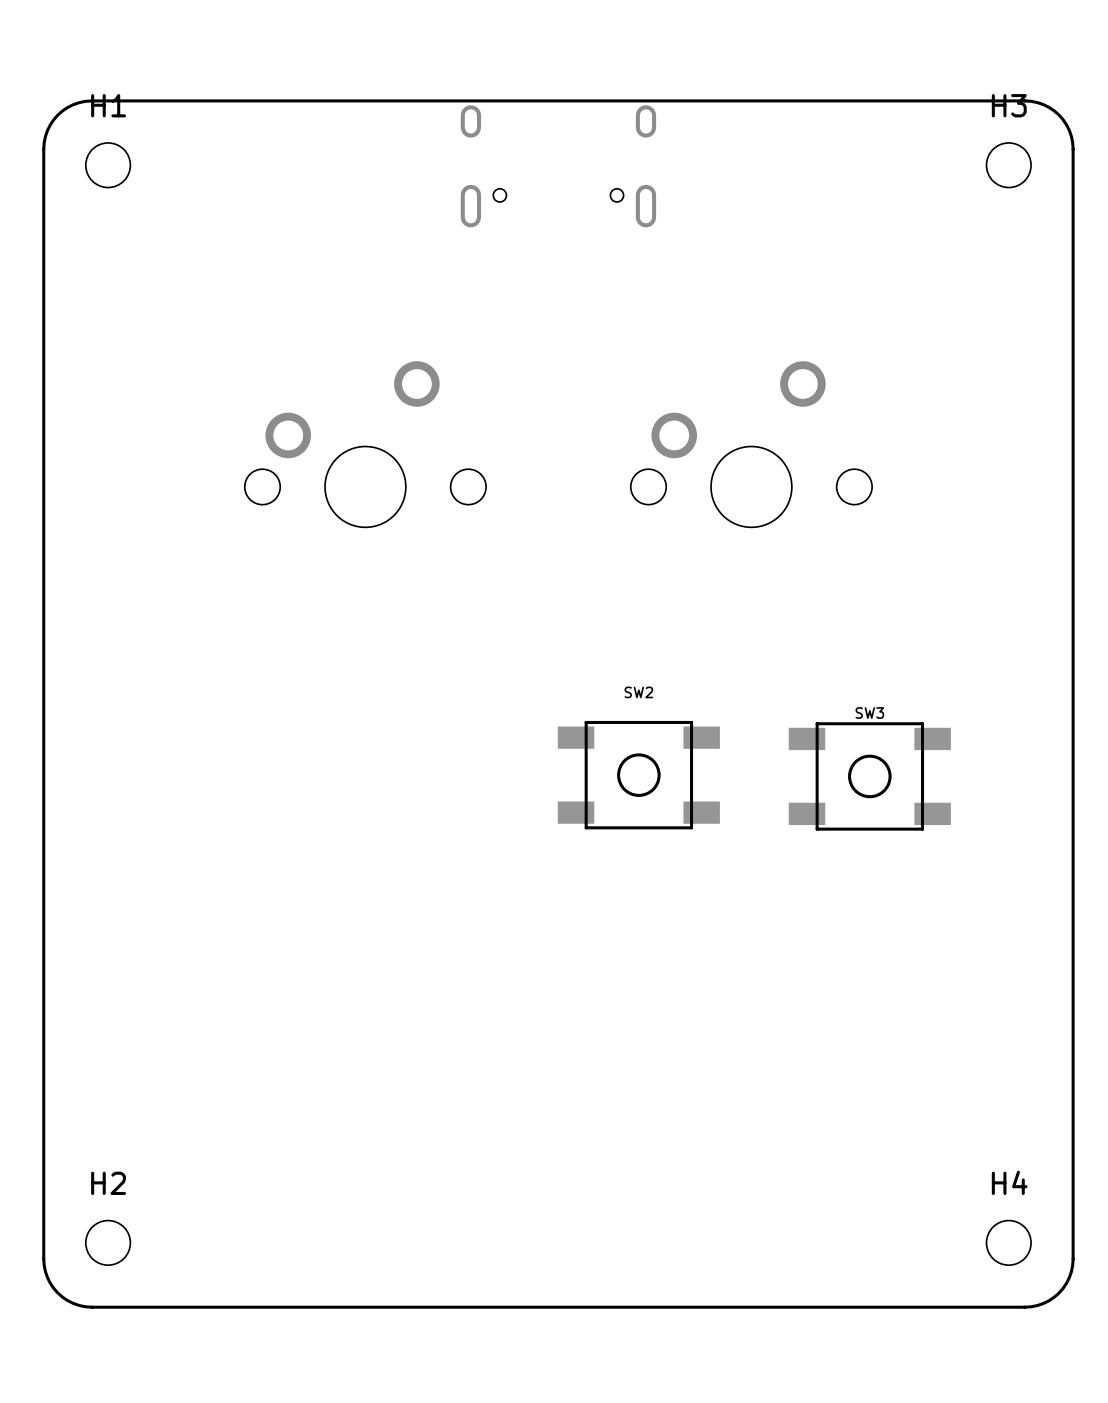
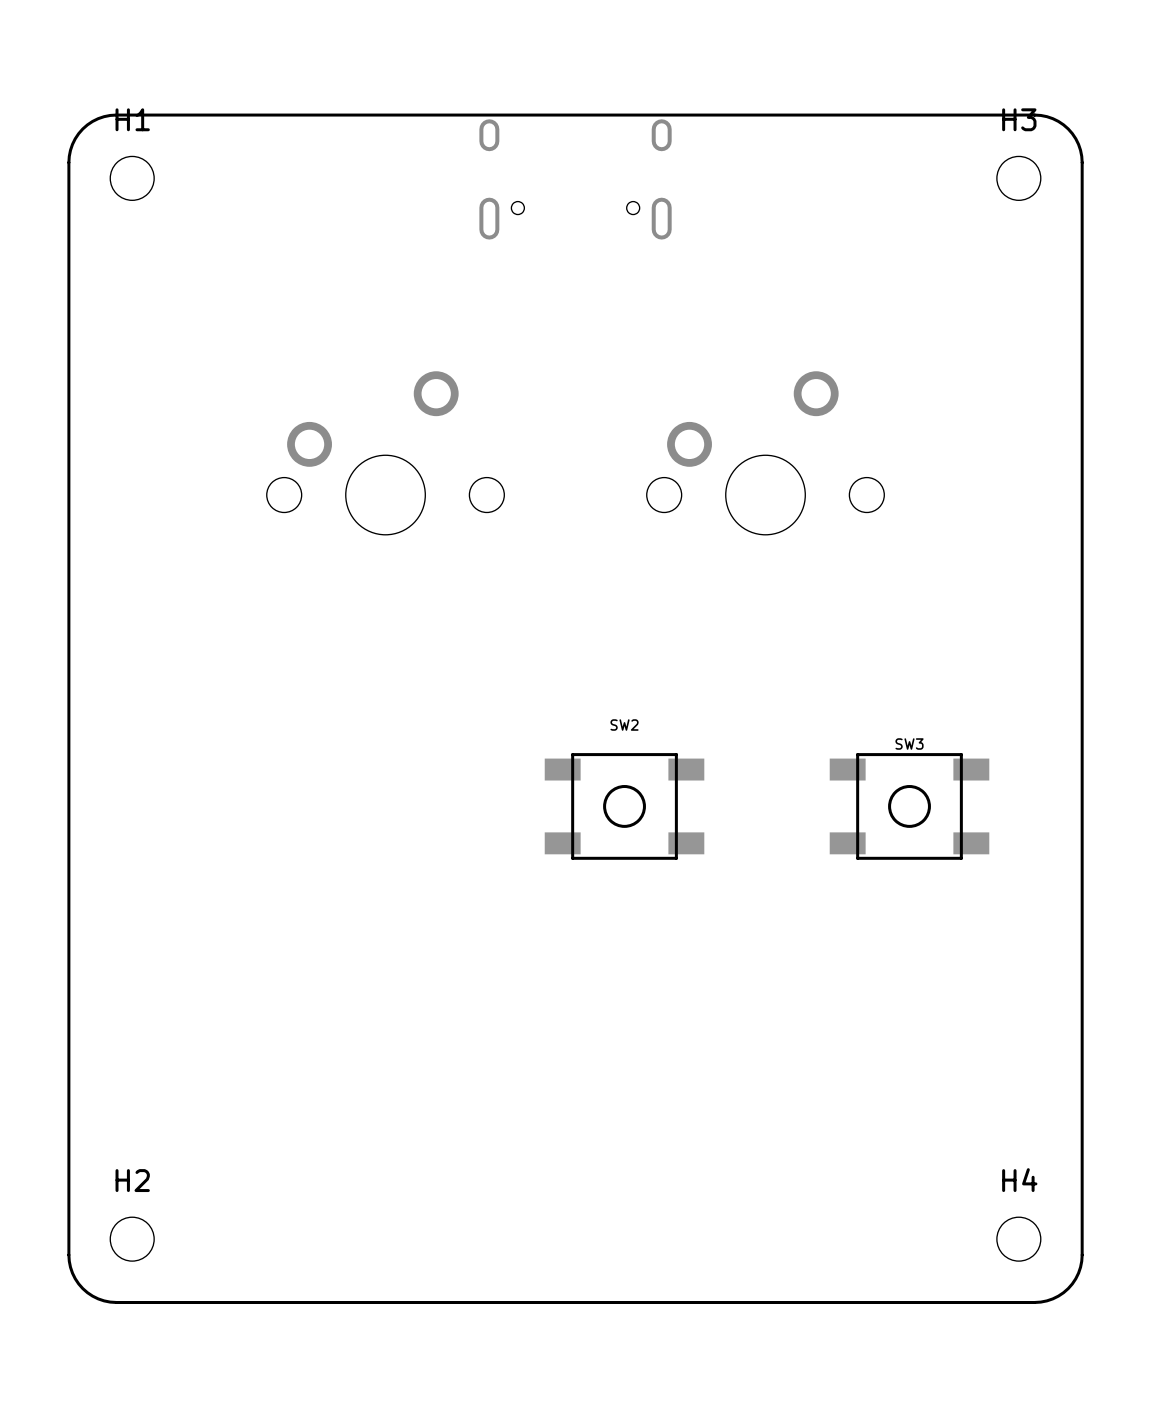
SW2 position: (638, 775) -> (624, 806)
SW3 position: (869, 776) -> (909, 806)

